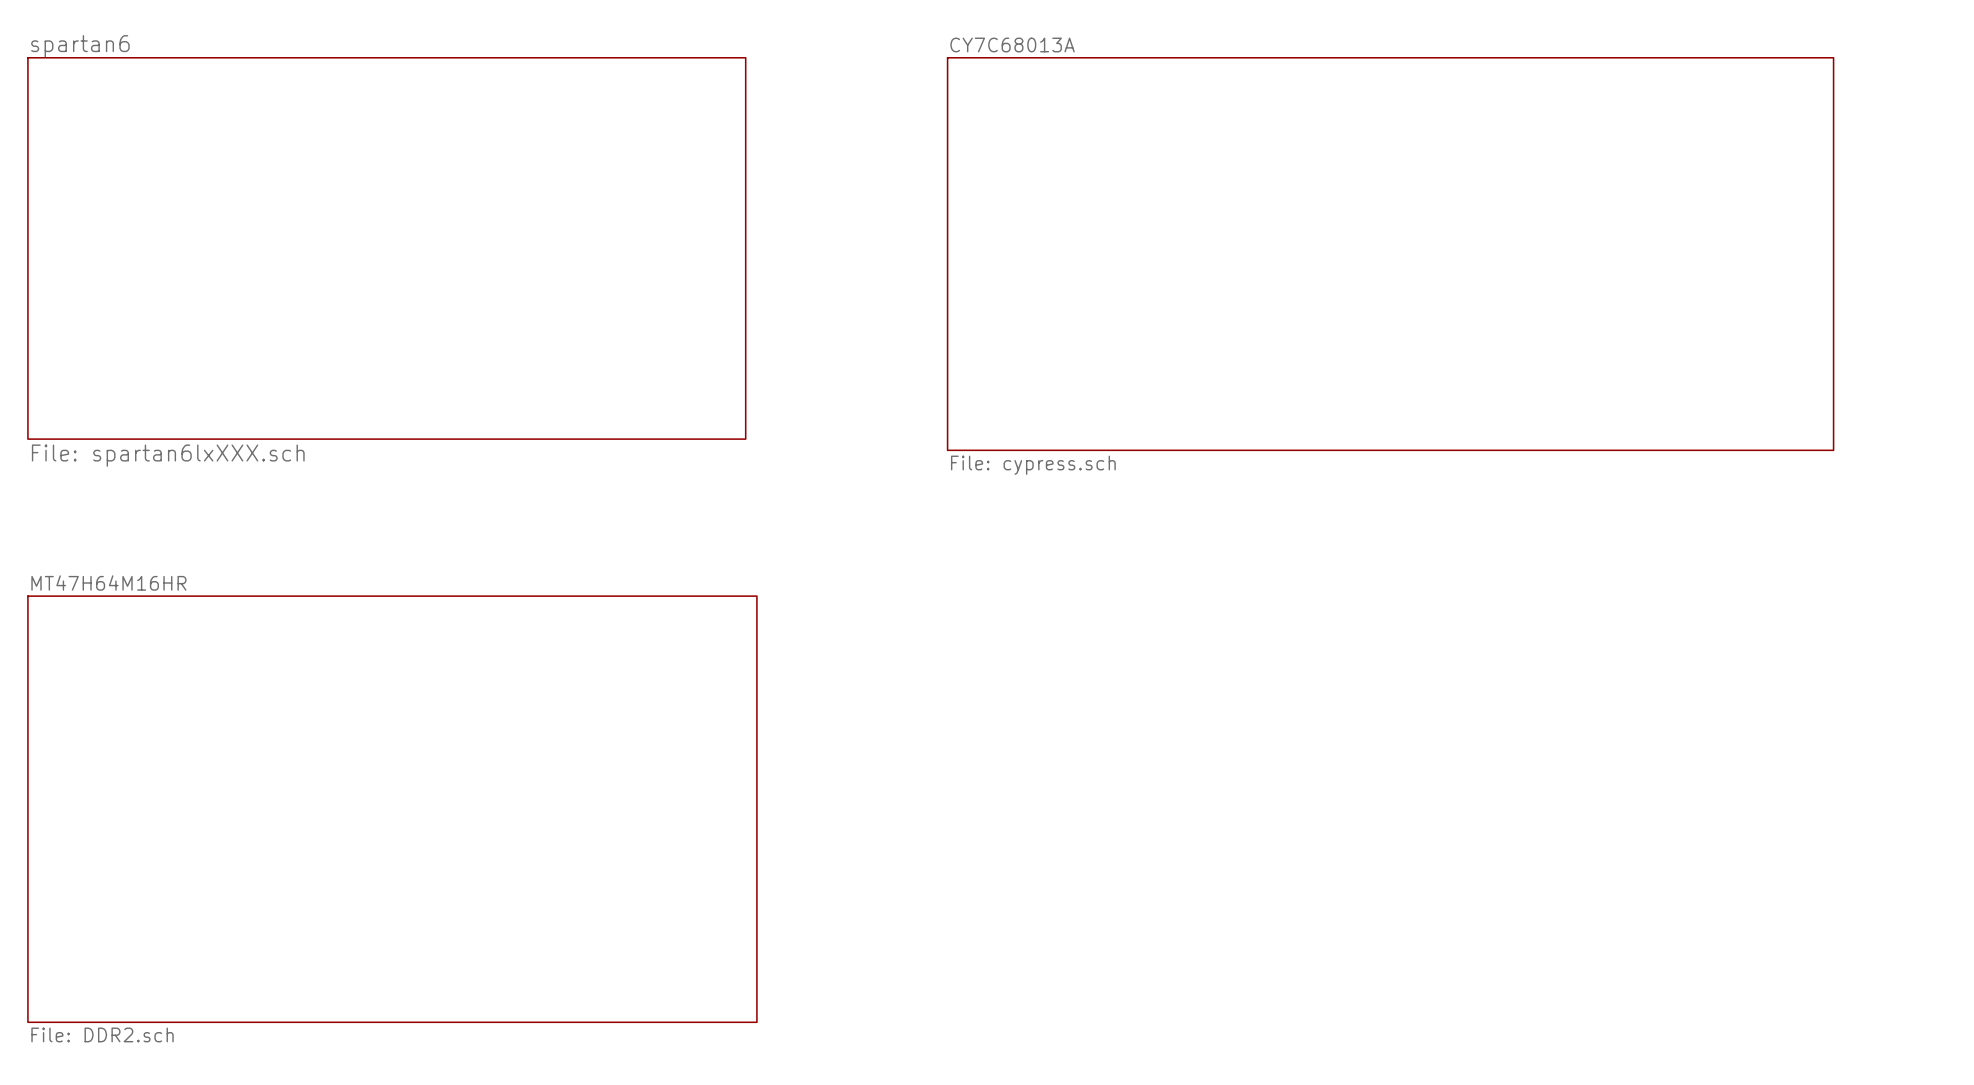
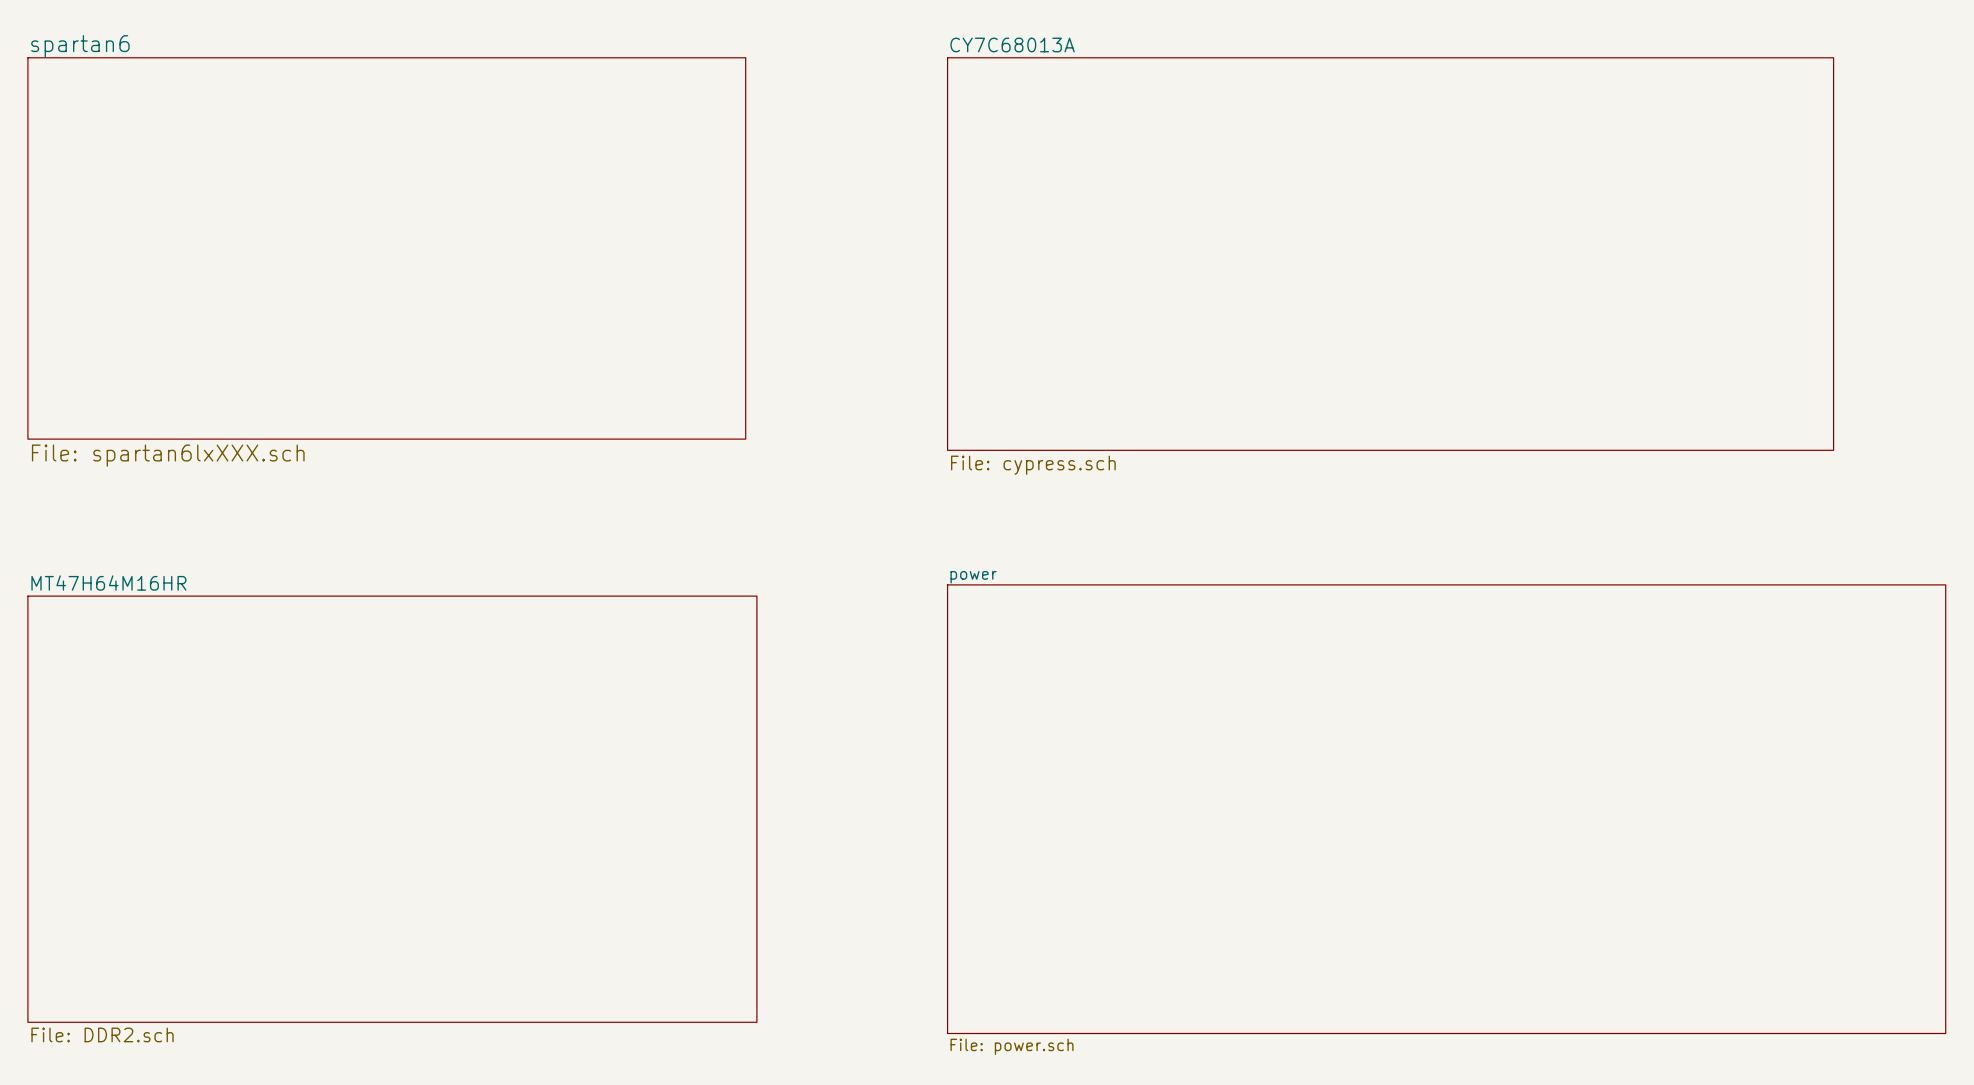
sheet power: none -> File: power.sch (1446, 809)

